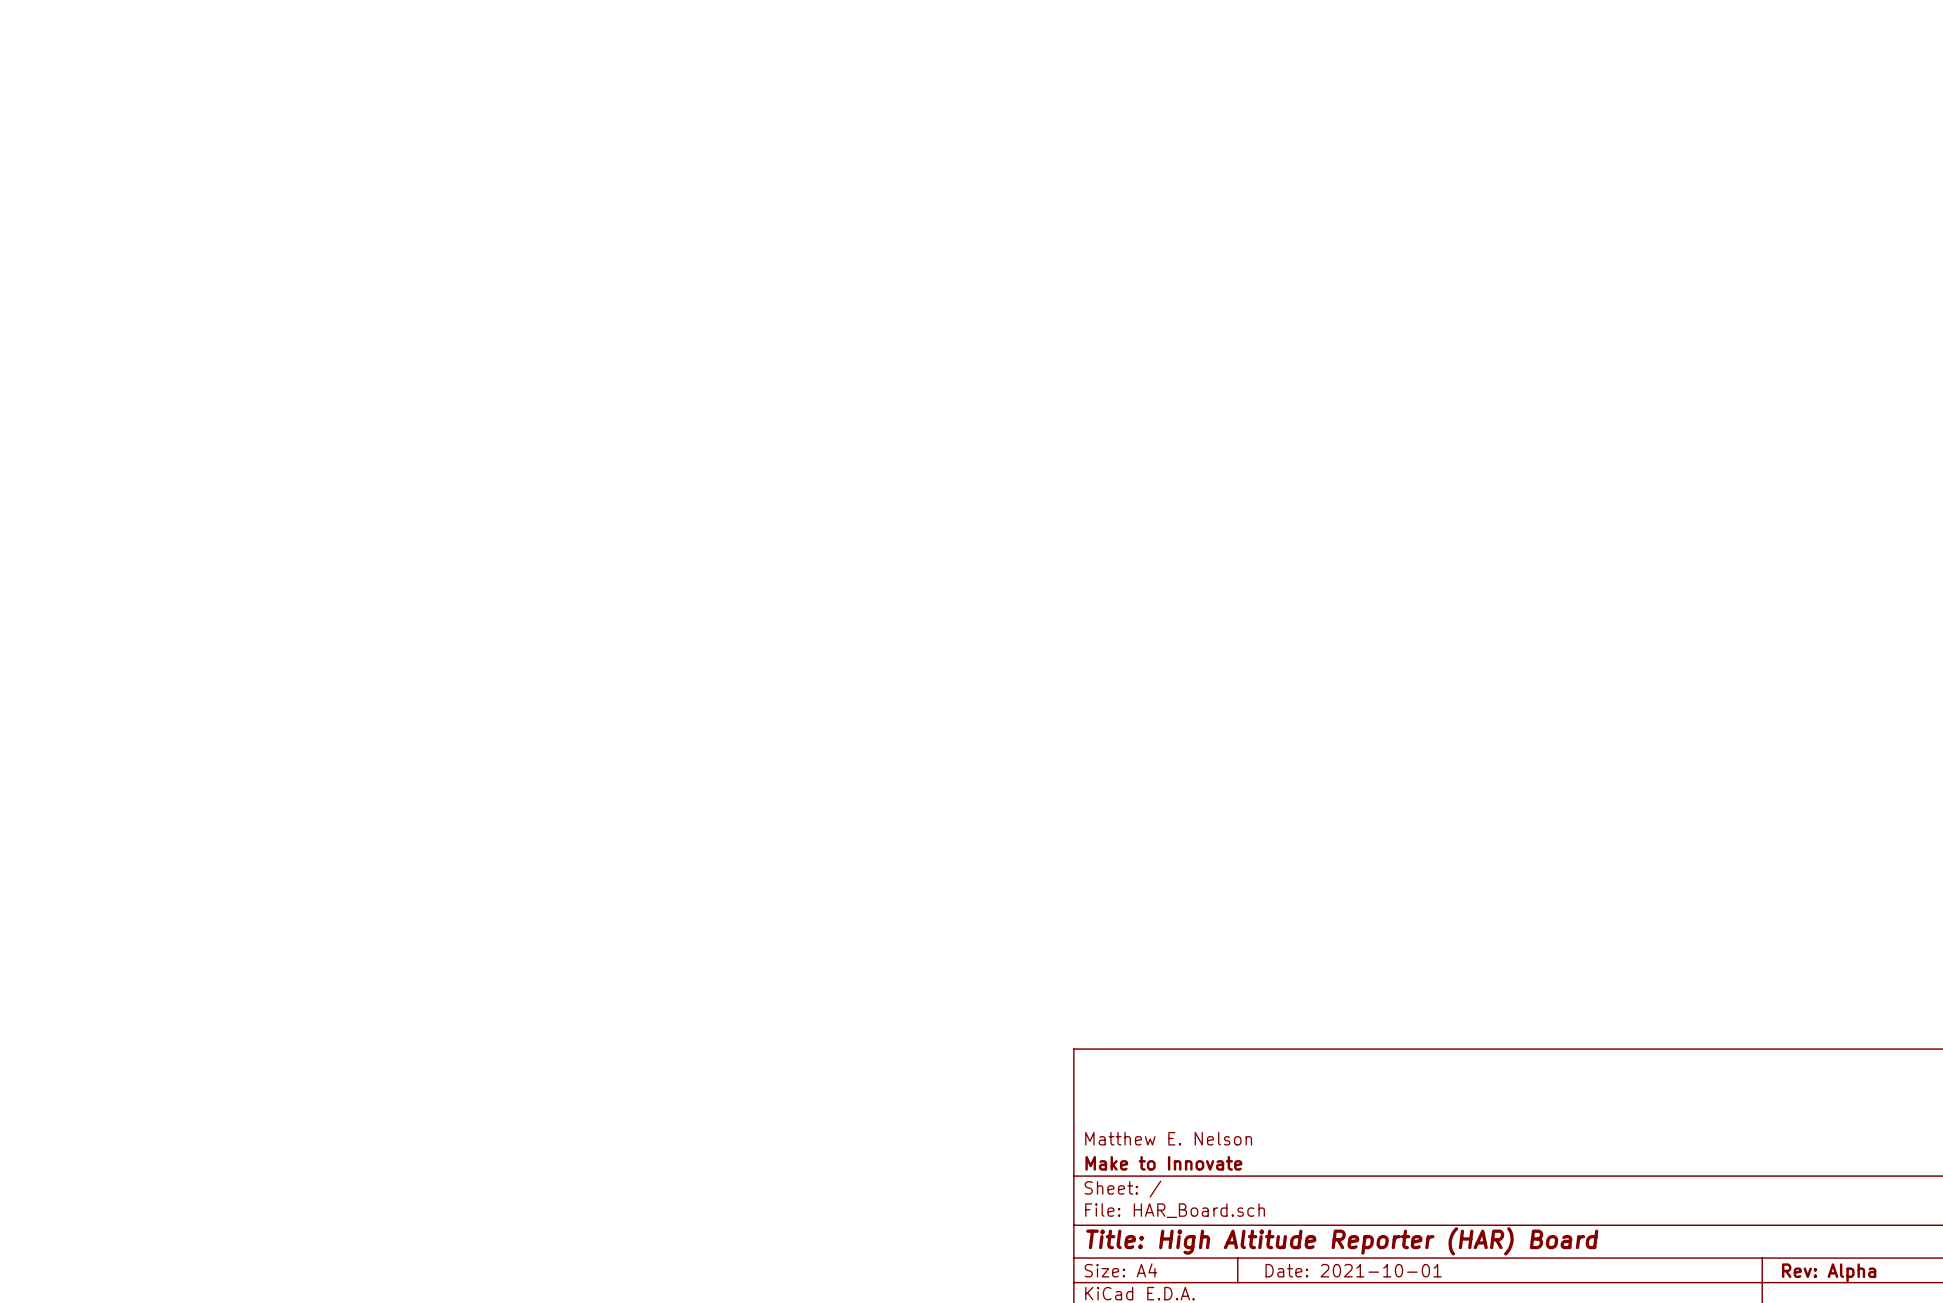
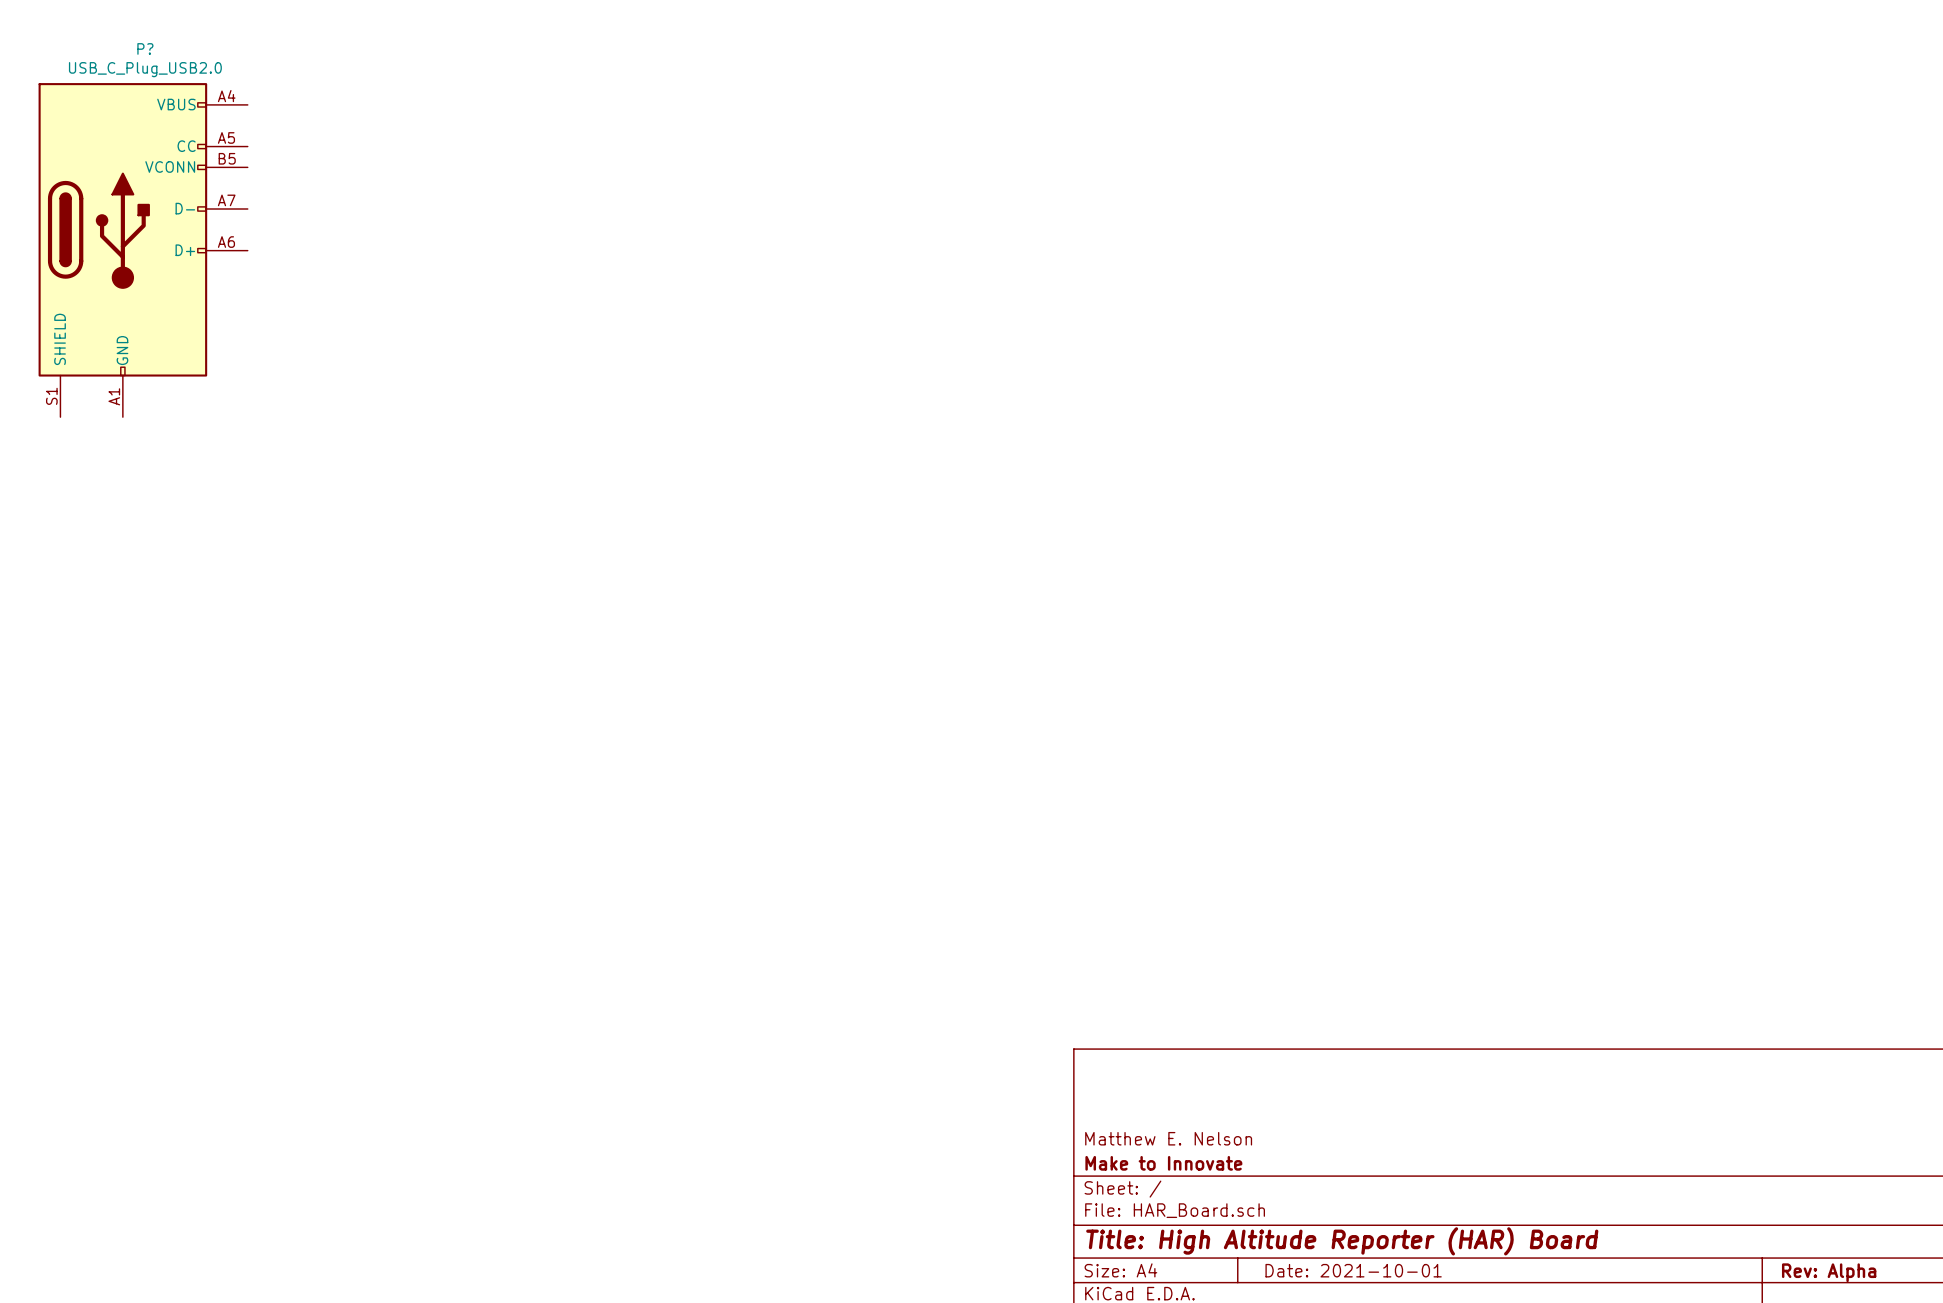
P?: none -> USB_C_Plug_USB2.0 (143, 250)

